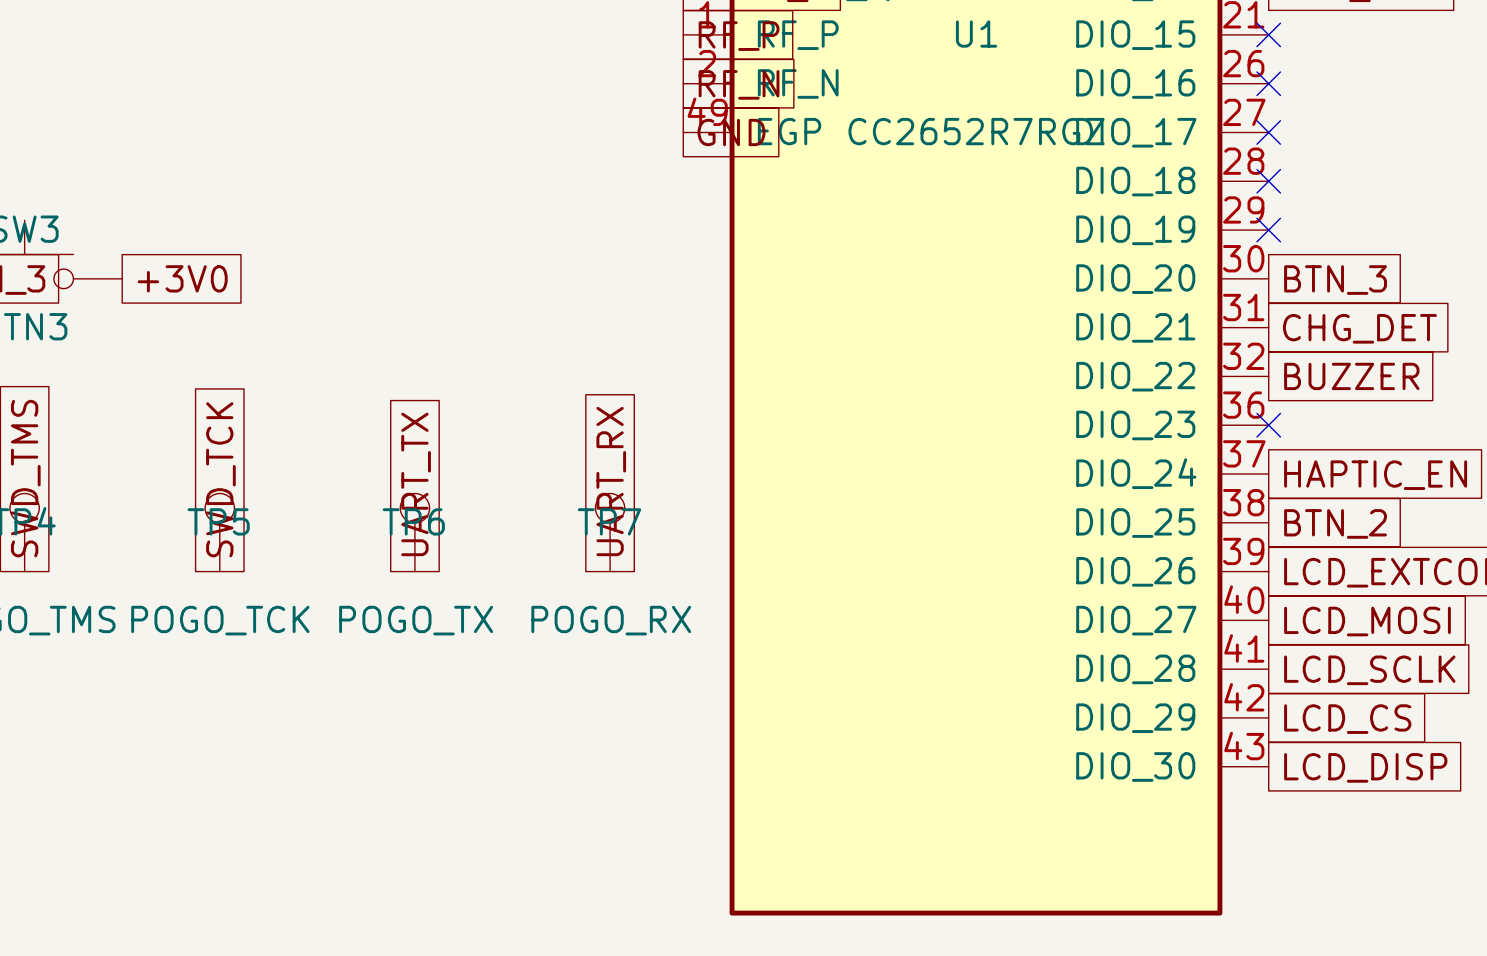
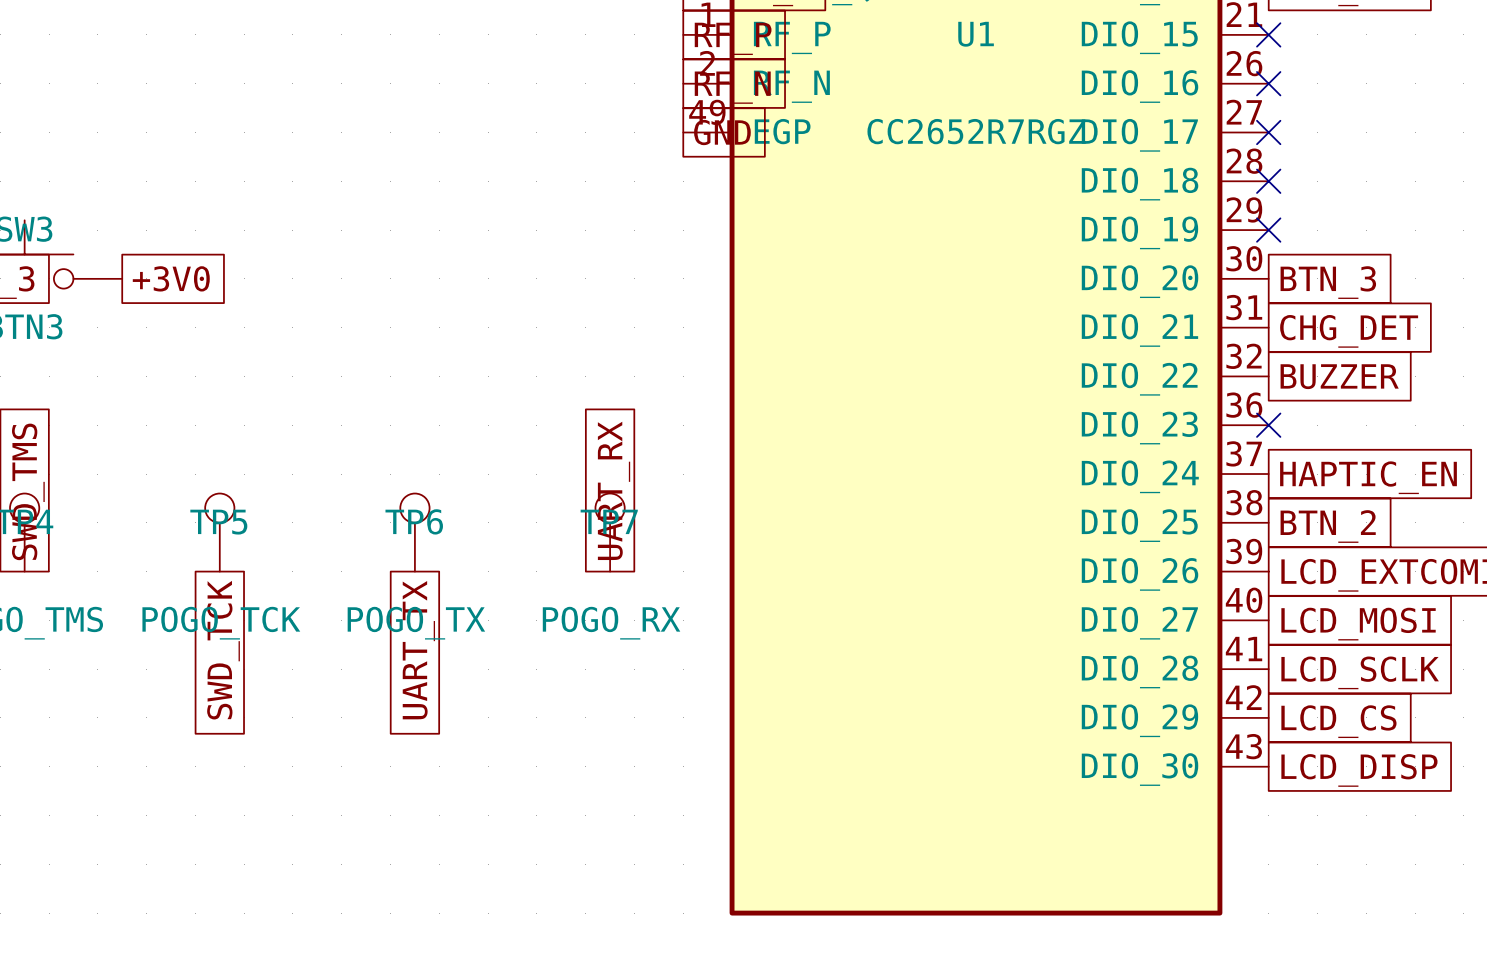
global label rotation: 0° (220, 479) -> 180° (223, 650)
global label rotation: 0° (416, 484) -> 180° (418, 650)

